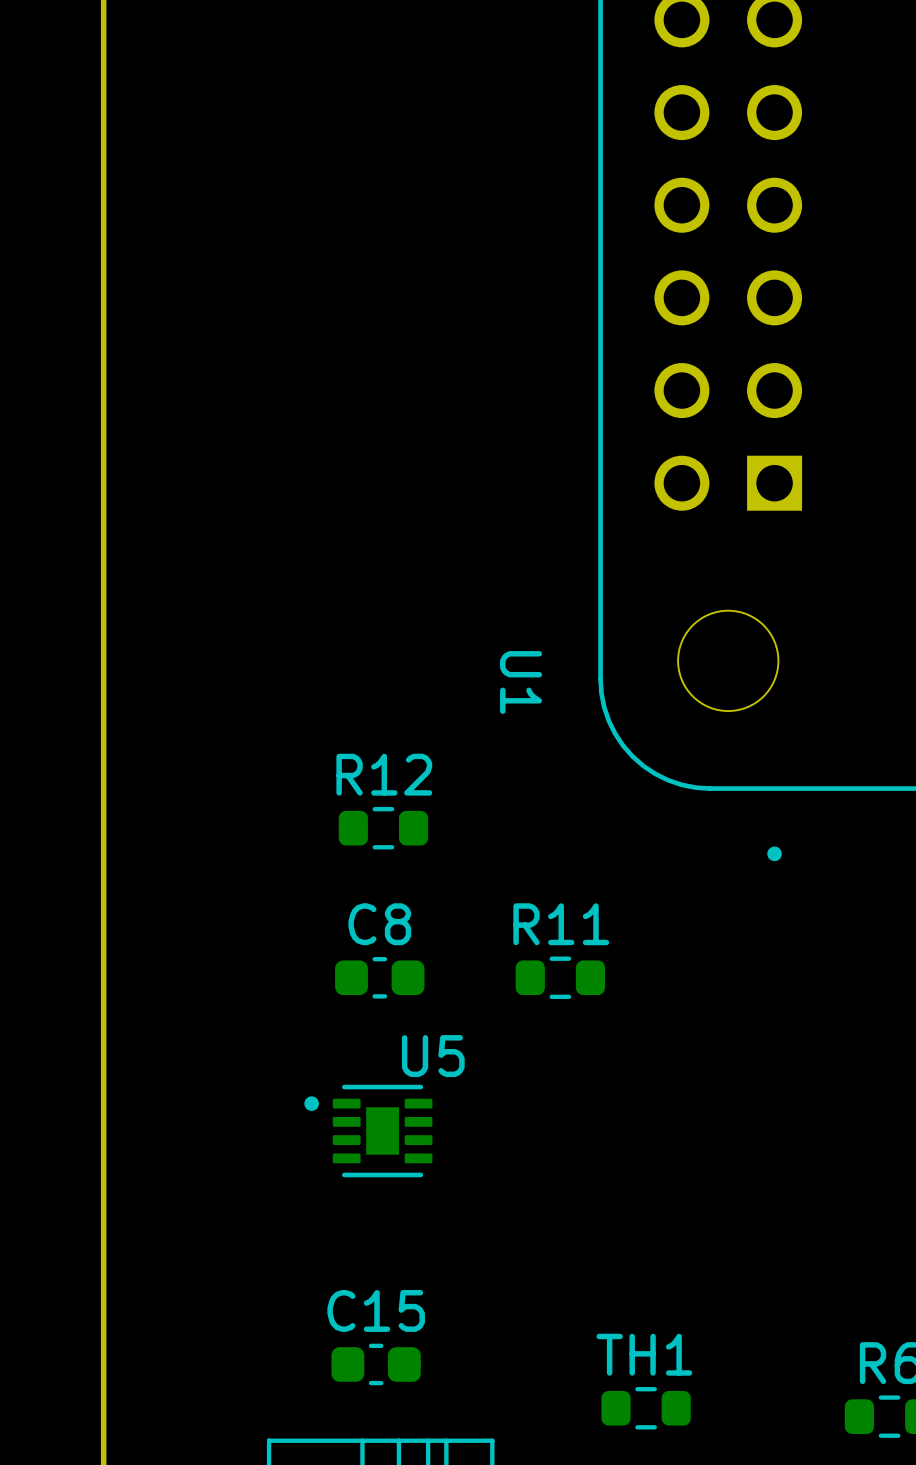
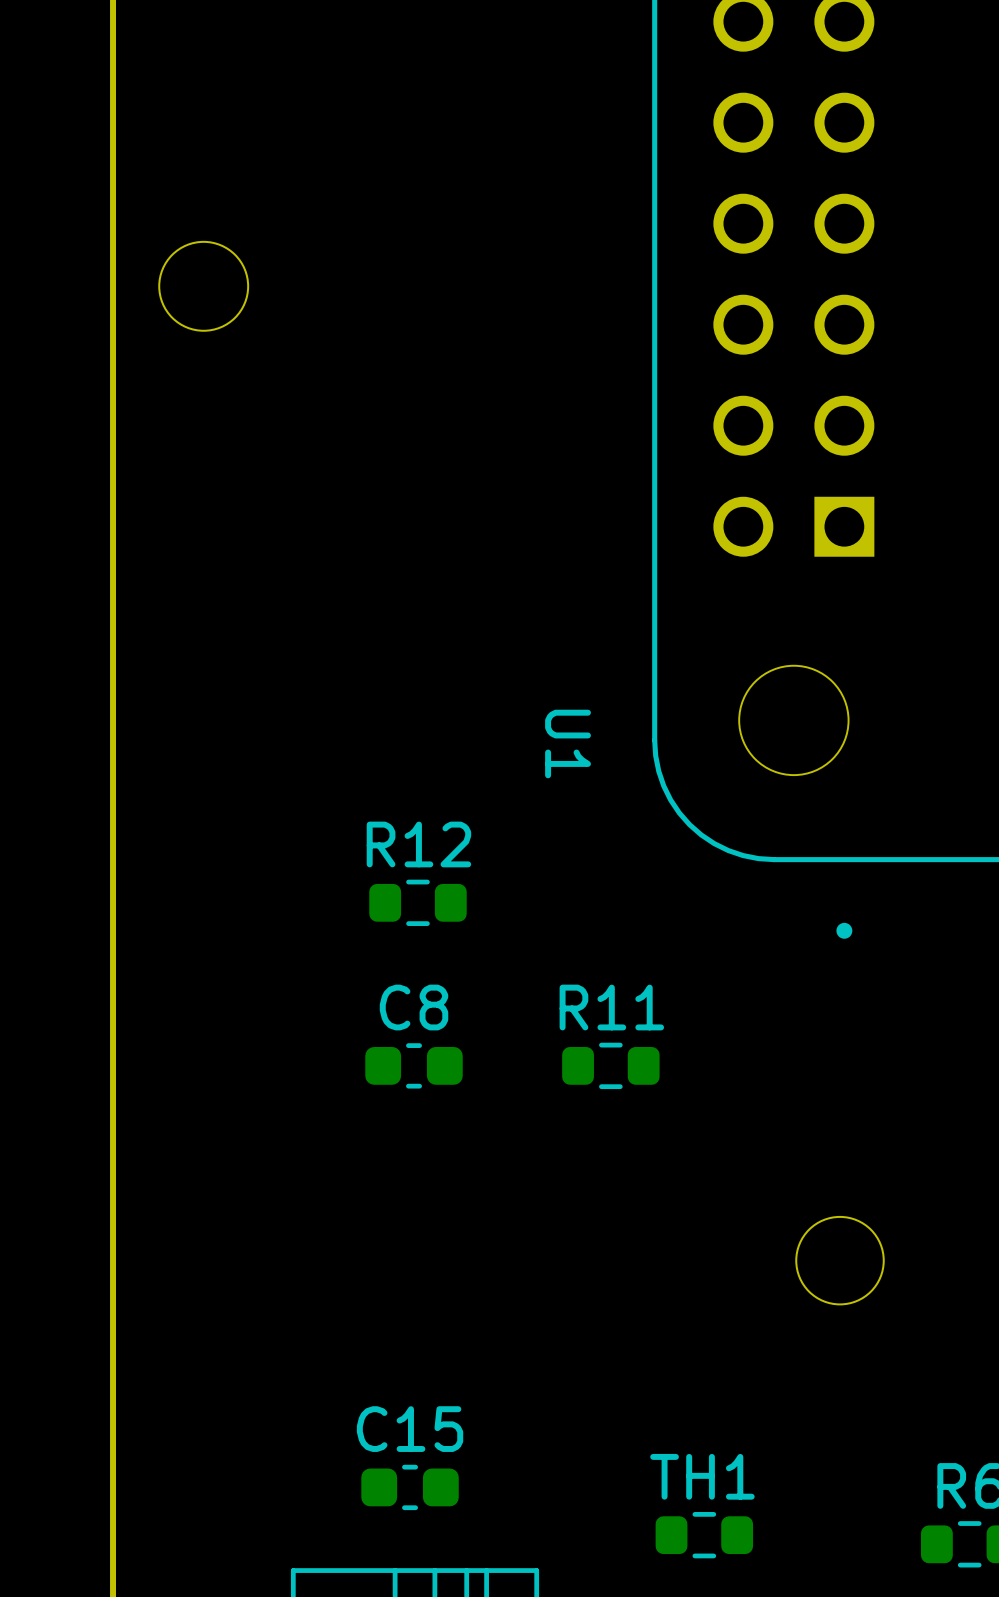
round board edge: none -> [158, 240, 250, 332]
round board edge: none -> [795, 1215, 885, 1306]
U5: (368, 1131) -> none

